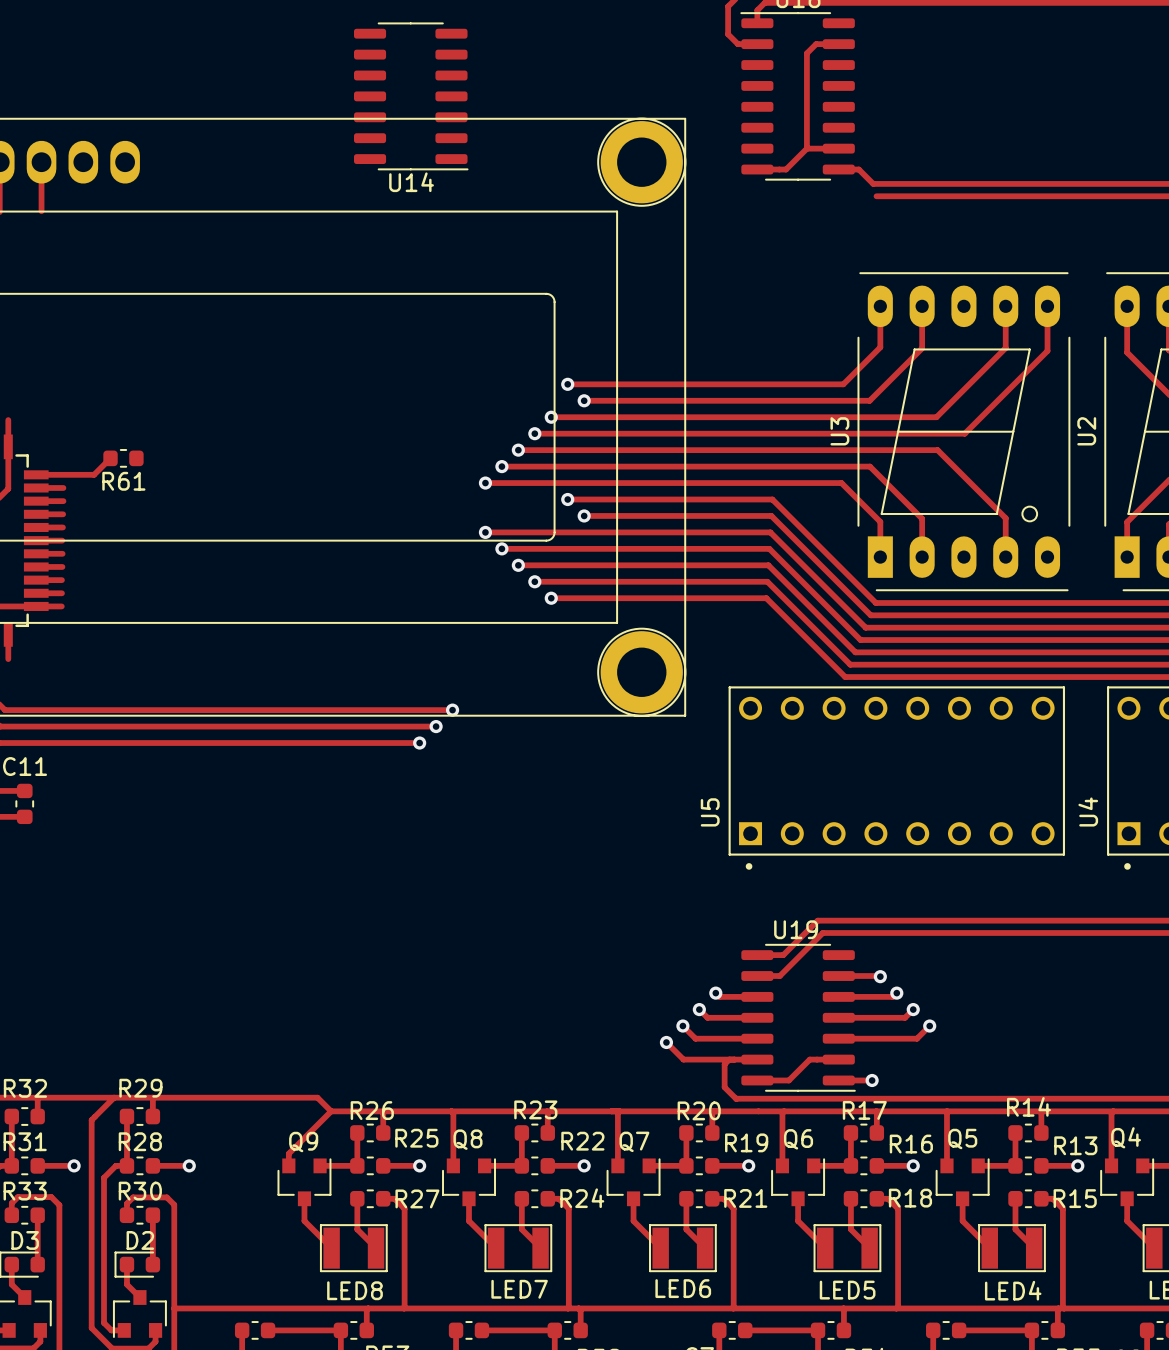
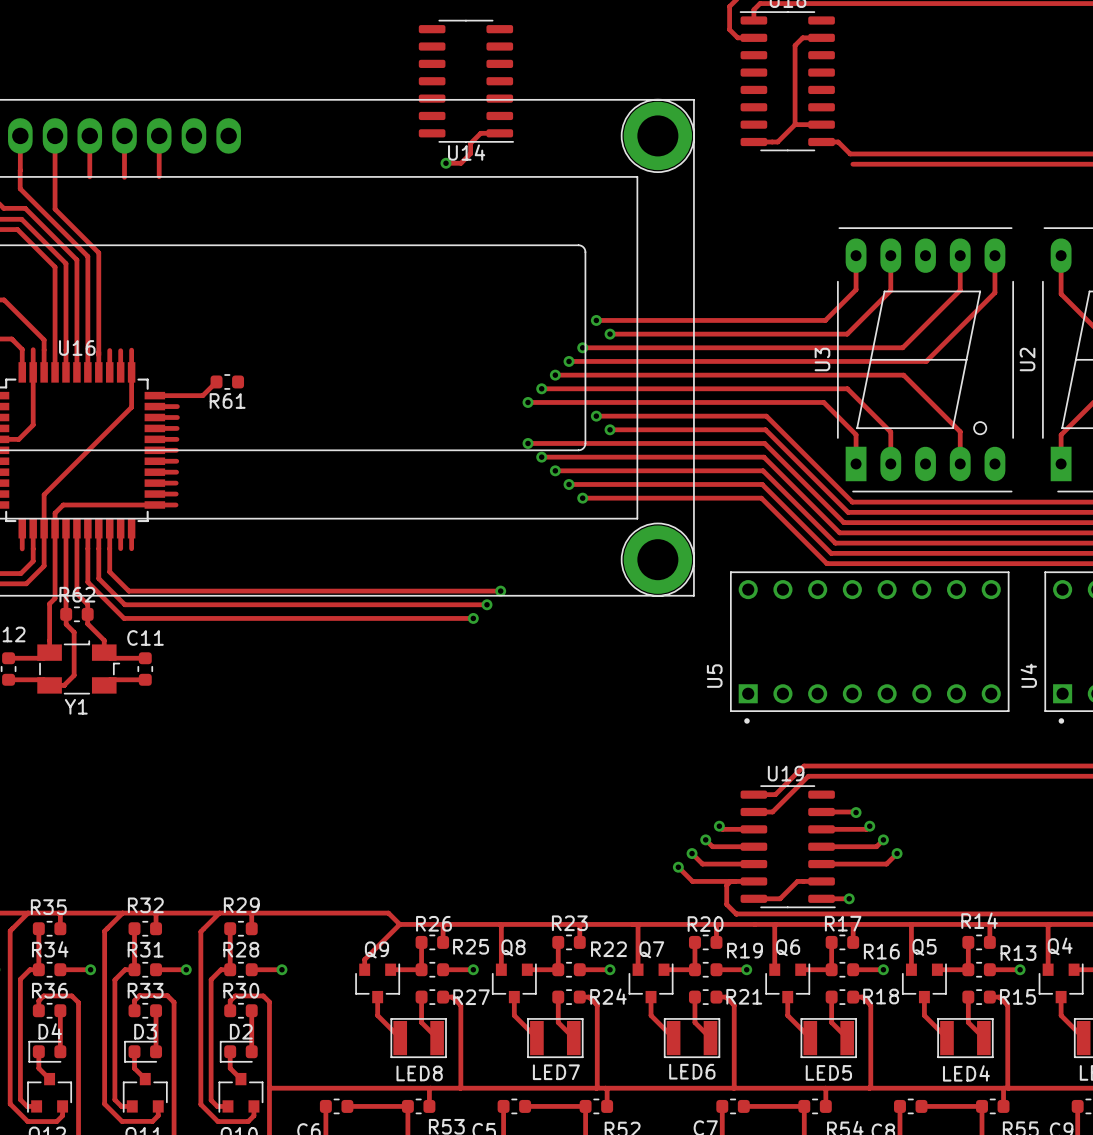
track: none -> (499, 133) (480, 133) (470, 143) (470, 153) (461, 163) (446, 163)
via: none -> (446, 163)

